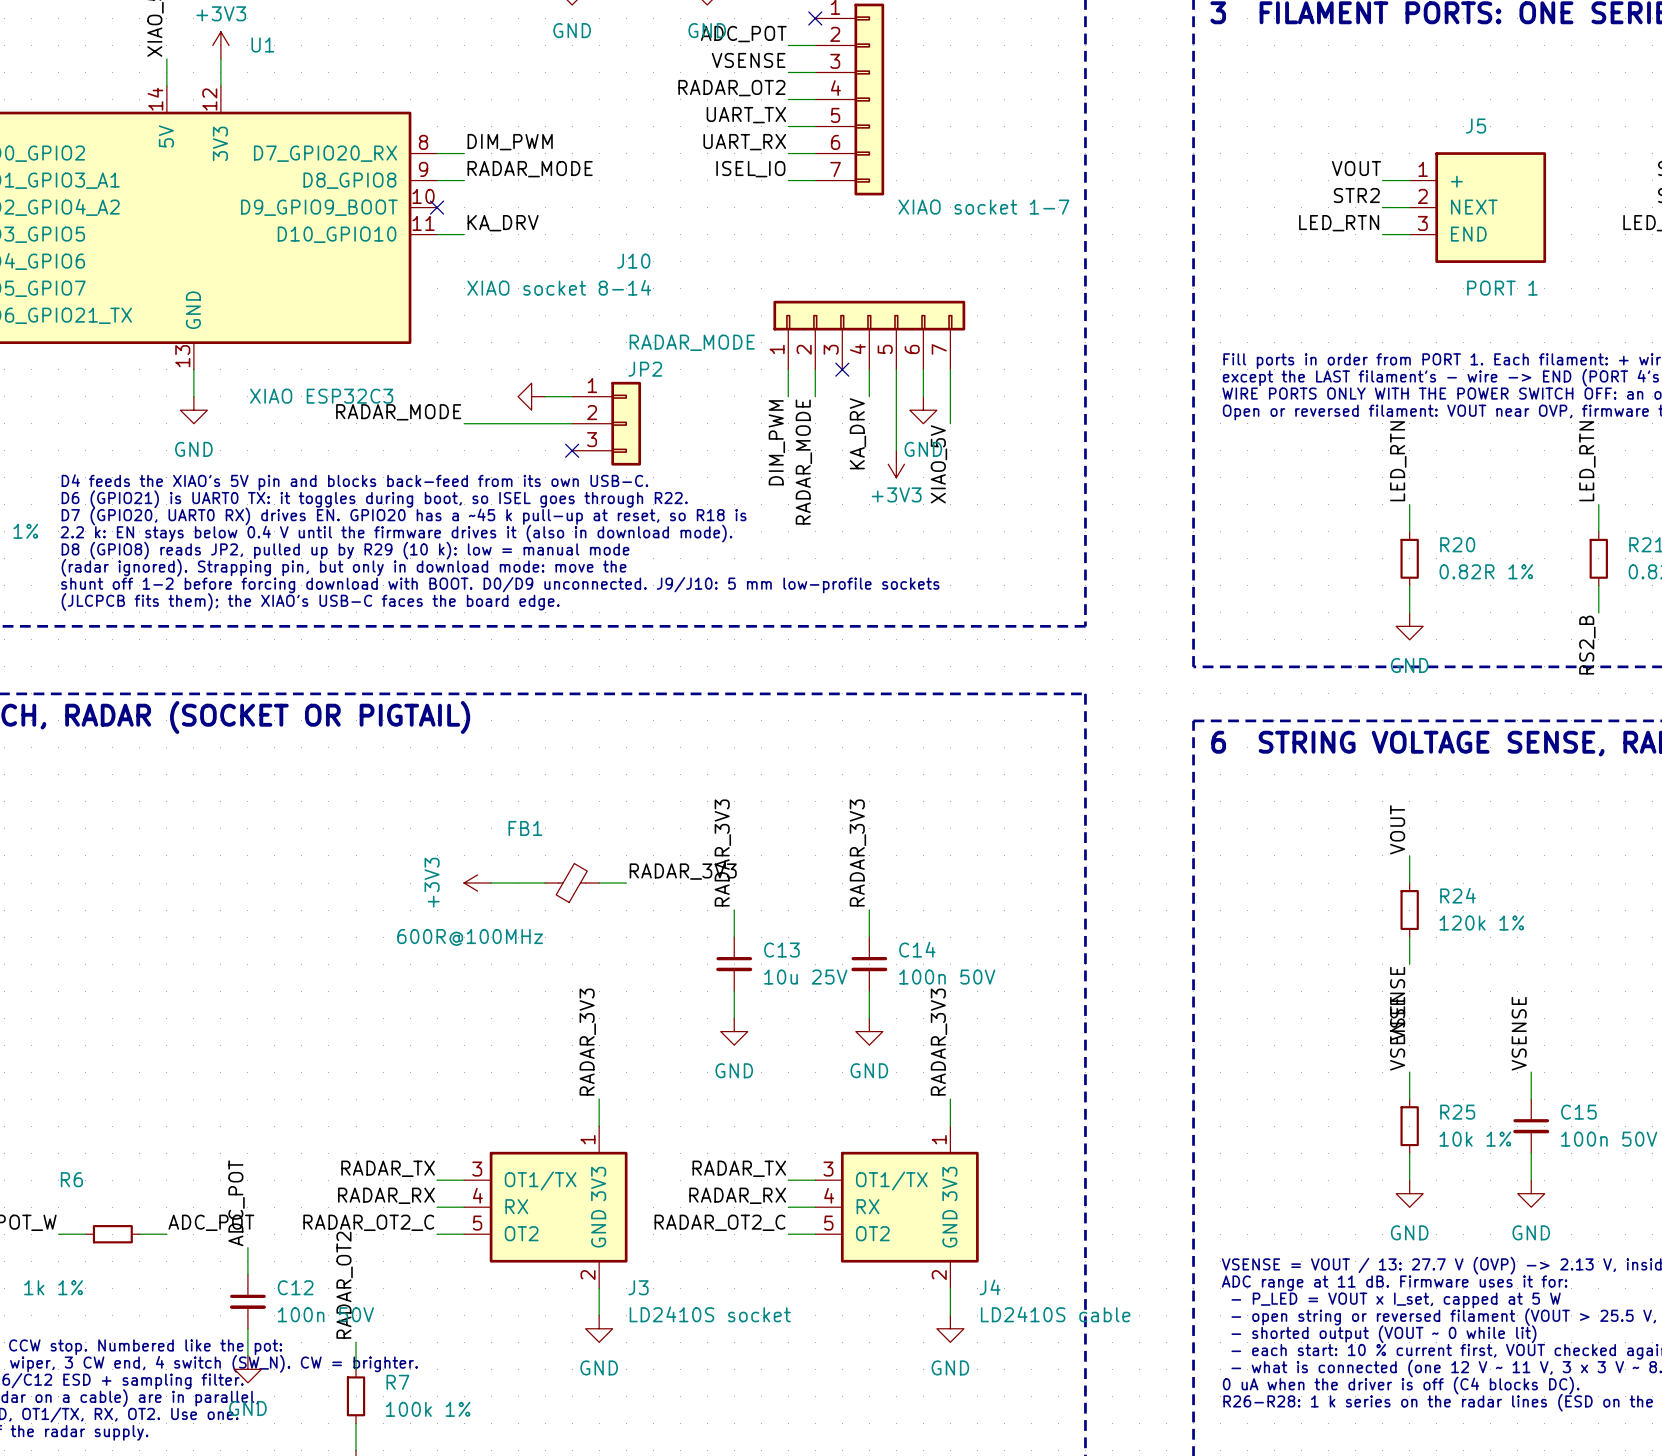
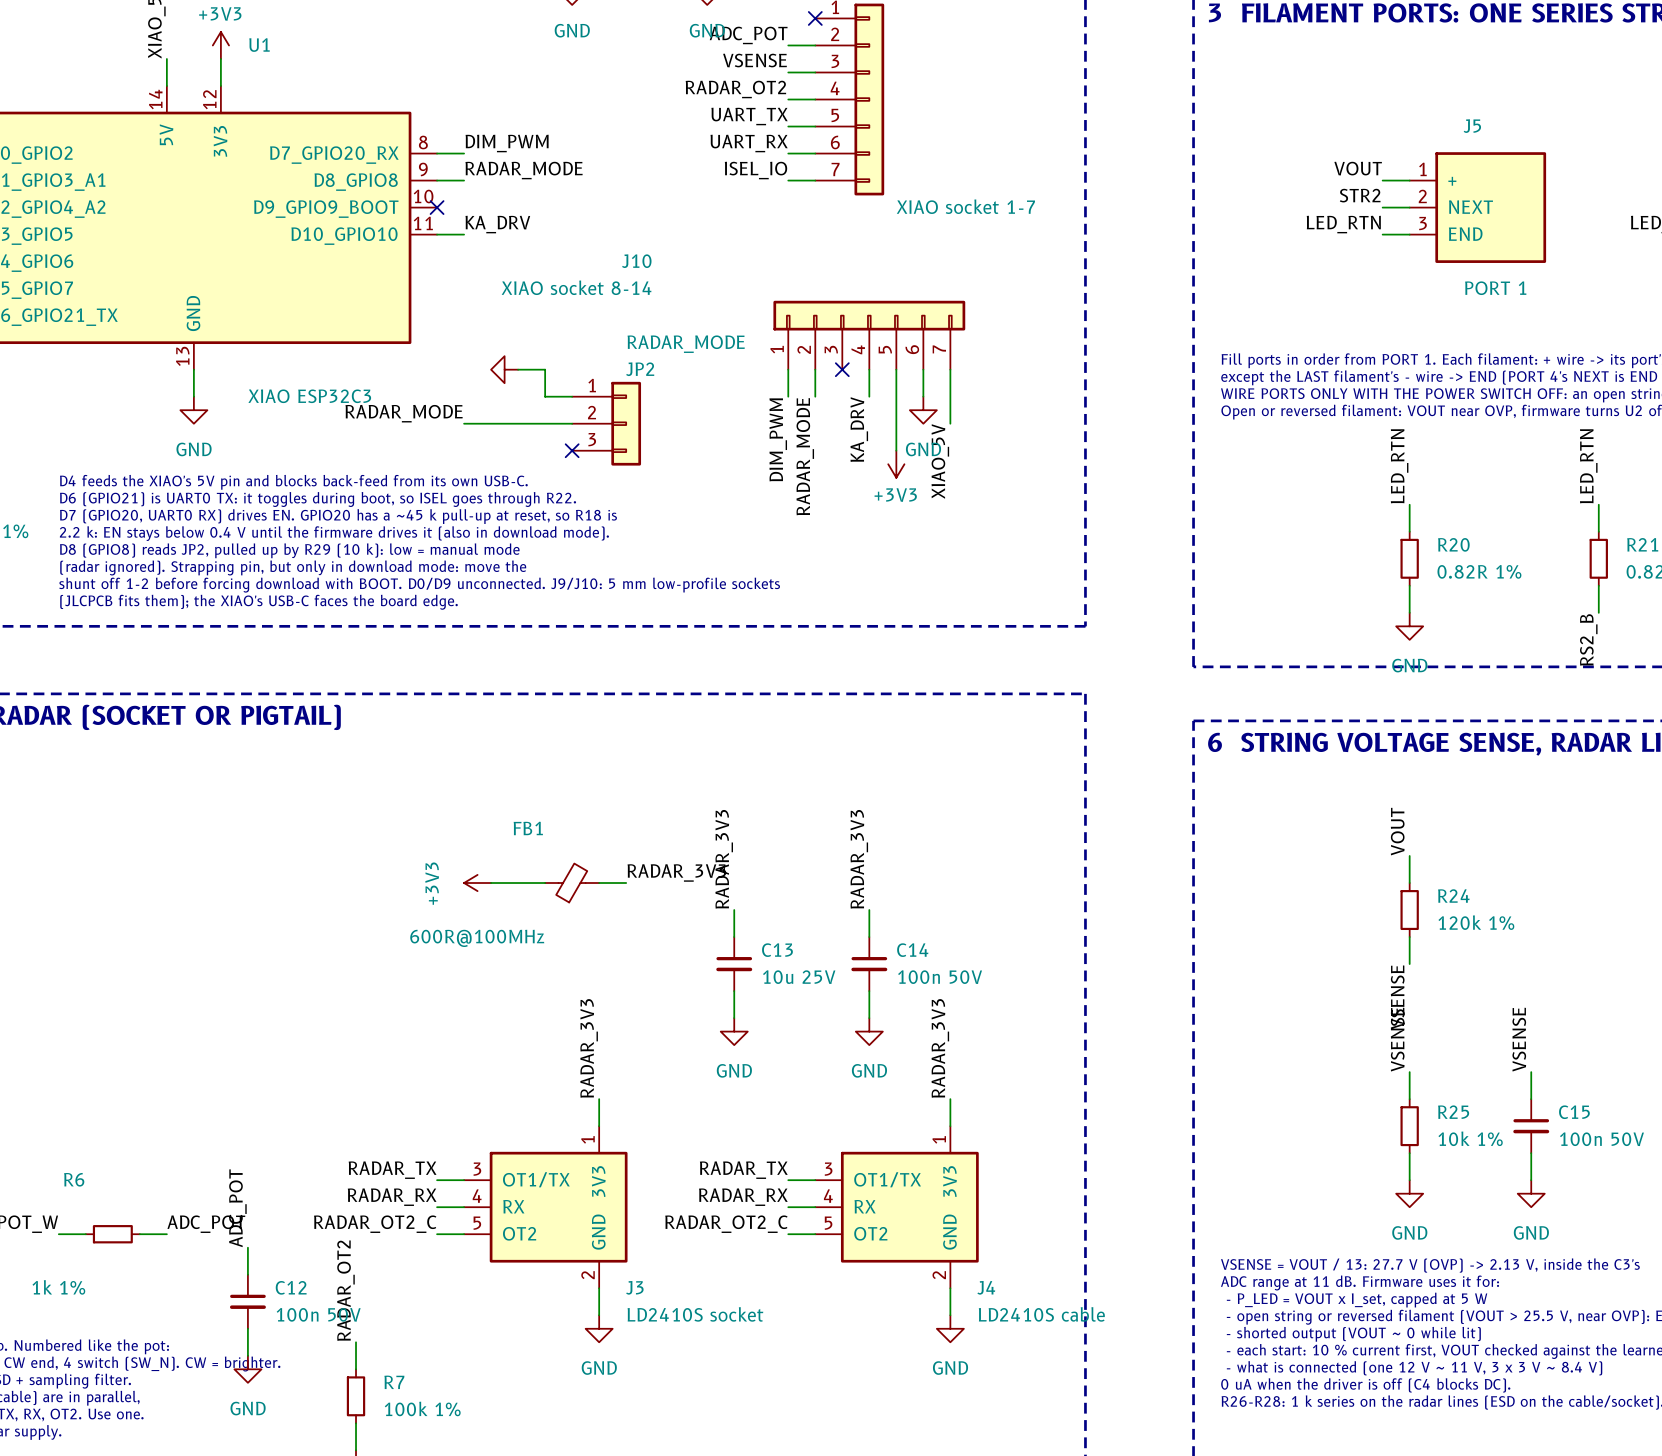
wire: none -> (518, 369) (545, 369) (545, 396)
power symbol position: (531, 396) -> (504, 369)

